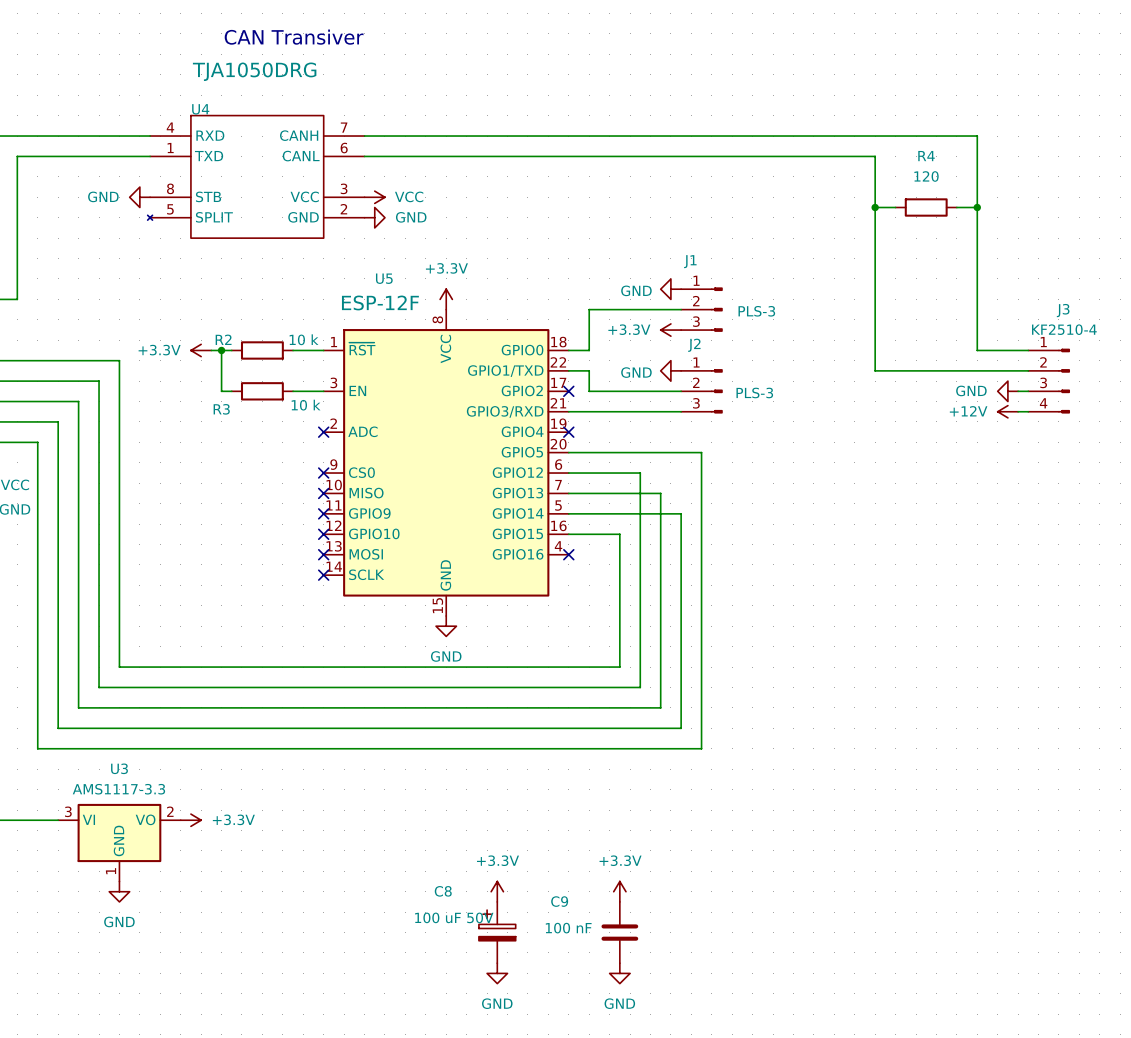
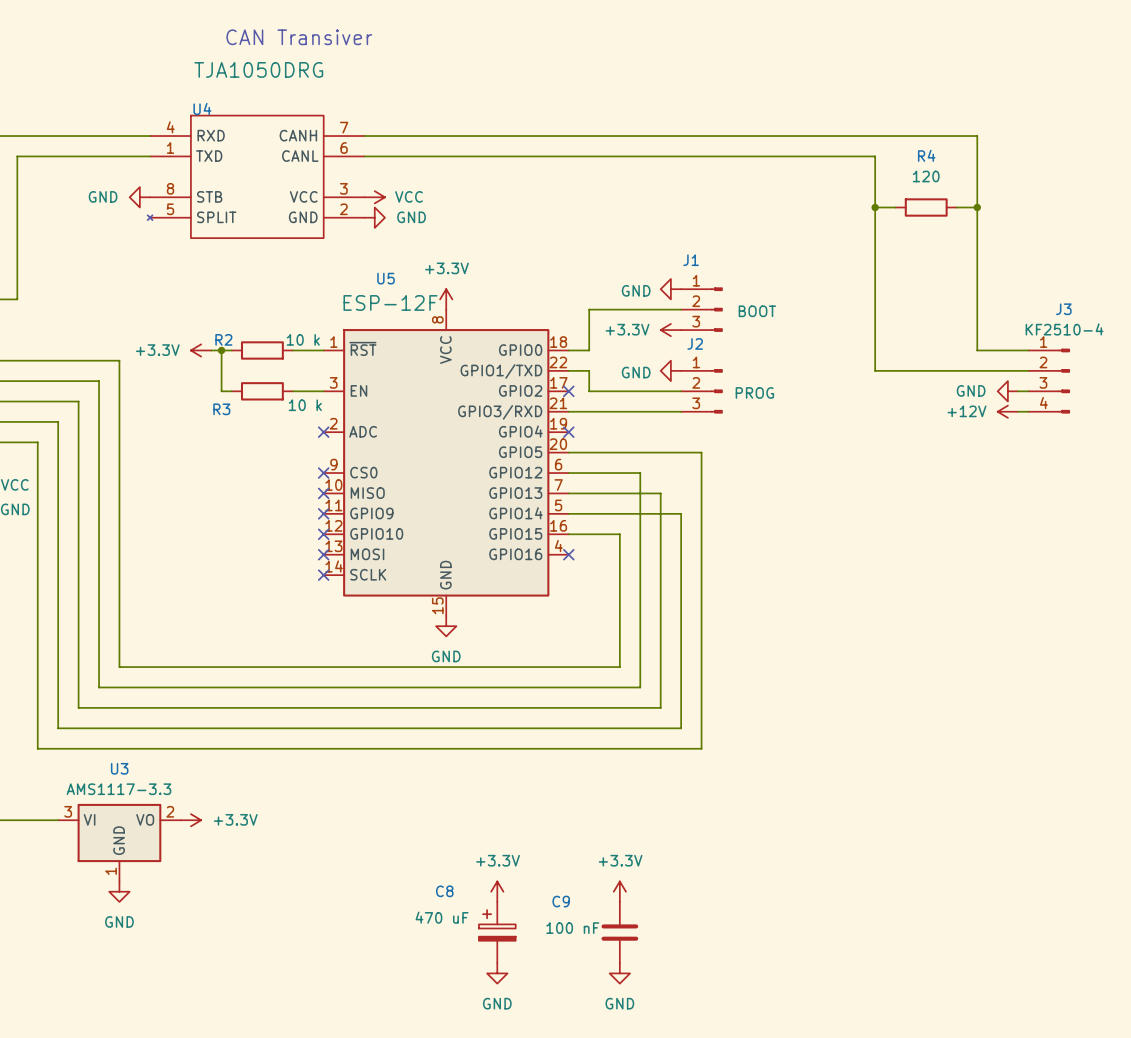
J1 value: PLS-3 (756, 311) -> BOOT (757, 311)
J2 value: PLS-3 (754, 392) -> PROG (754, 392)
C8 value: 100 uF 50V (454, 917) -> 470 uF (442, 917)

